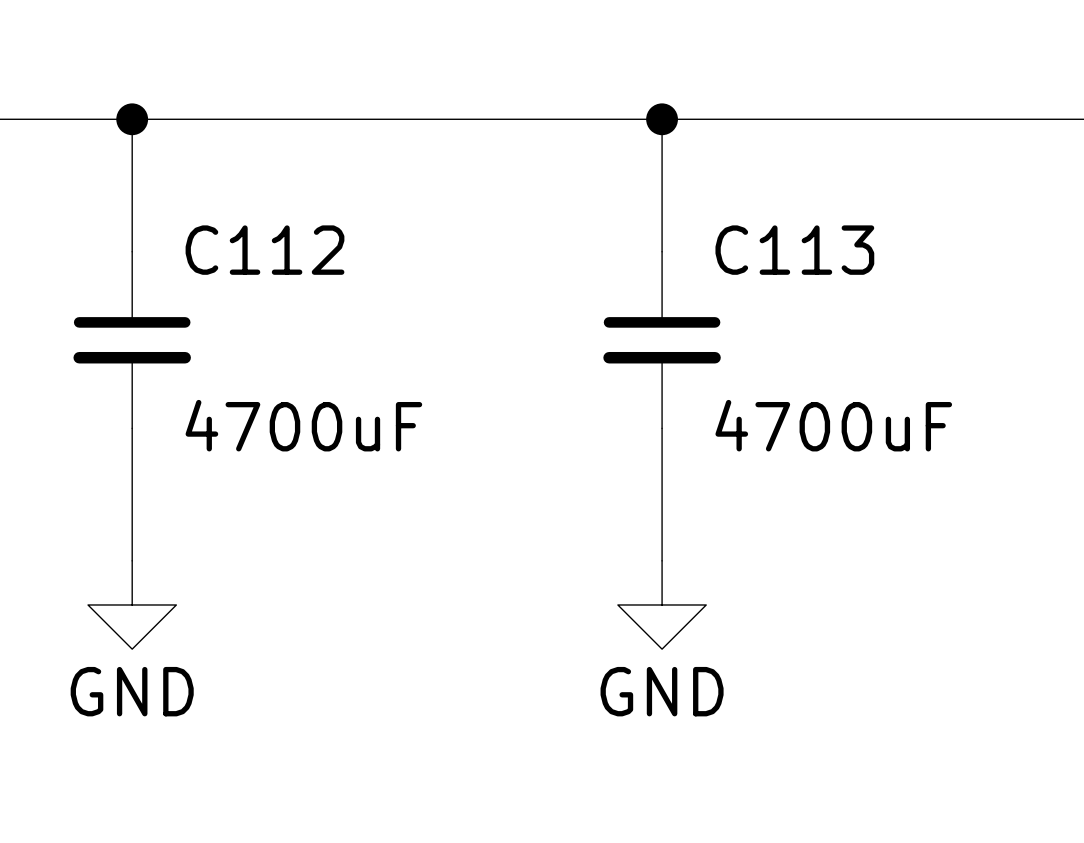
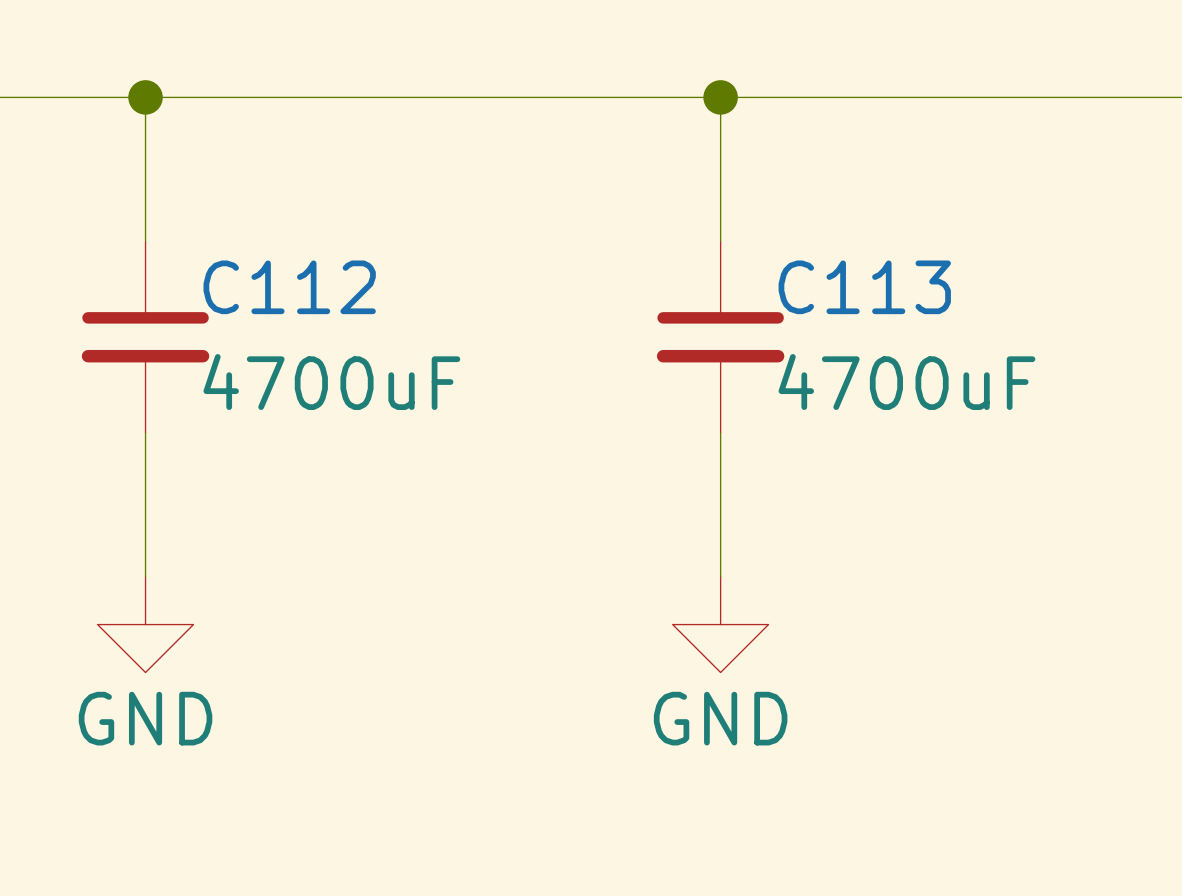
C112 name position: C112 (264, 250) -> C112 (289, 287)
C113 name position: C113 (794, 250) -> C113 (864, 287)
C112 value position: 4700uF (303, 425) -> 4700uF (331, 382)
C113 value position: 4700uF (833, 425) -> 4700uF (906, 382)

